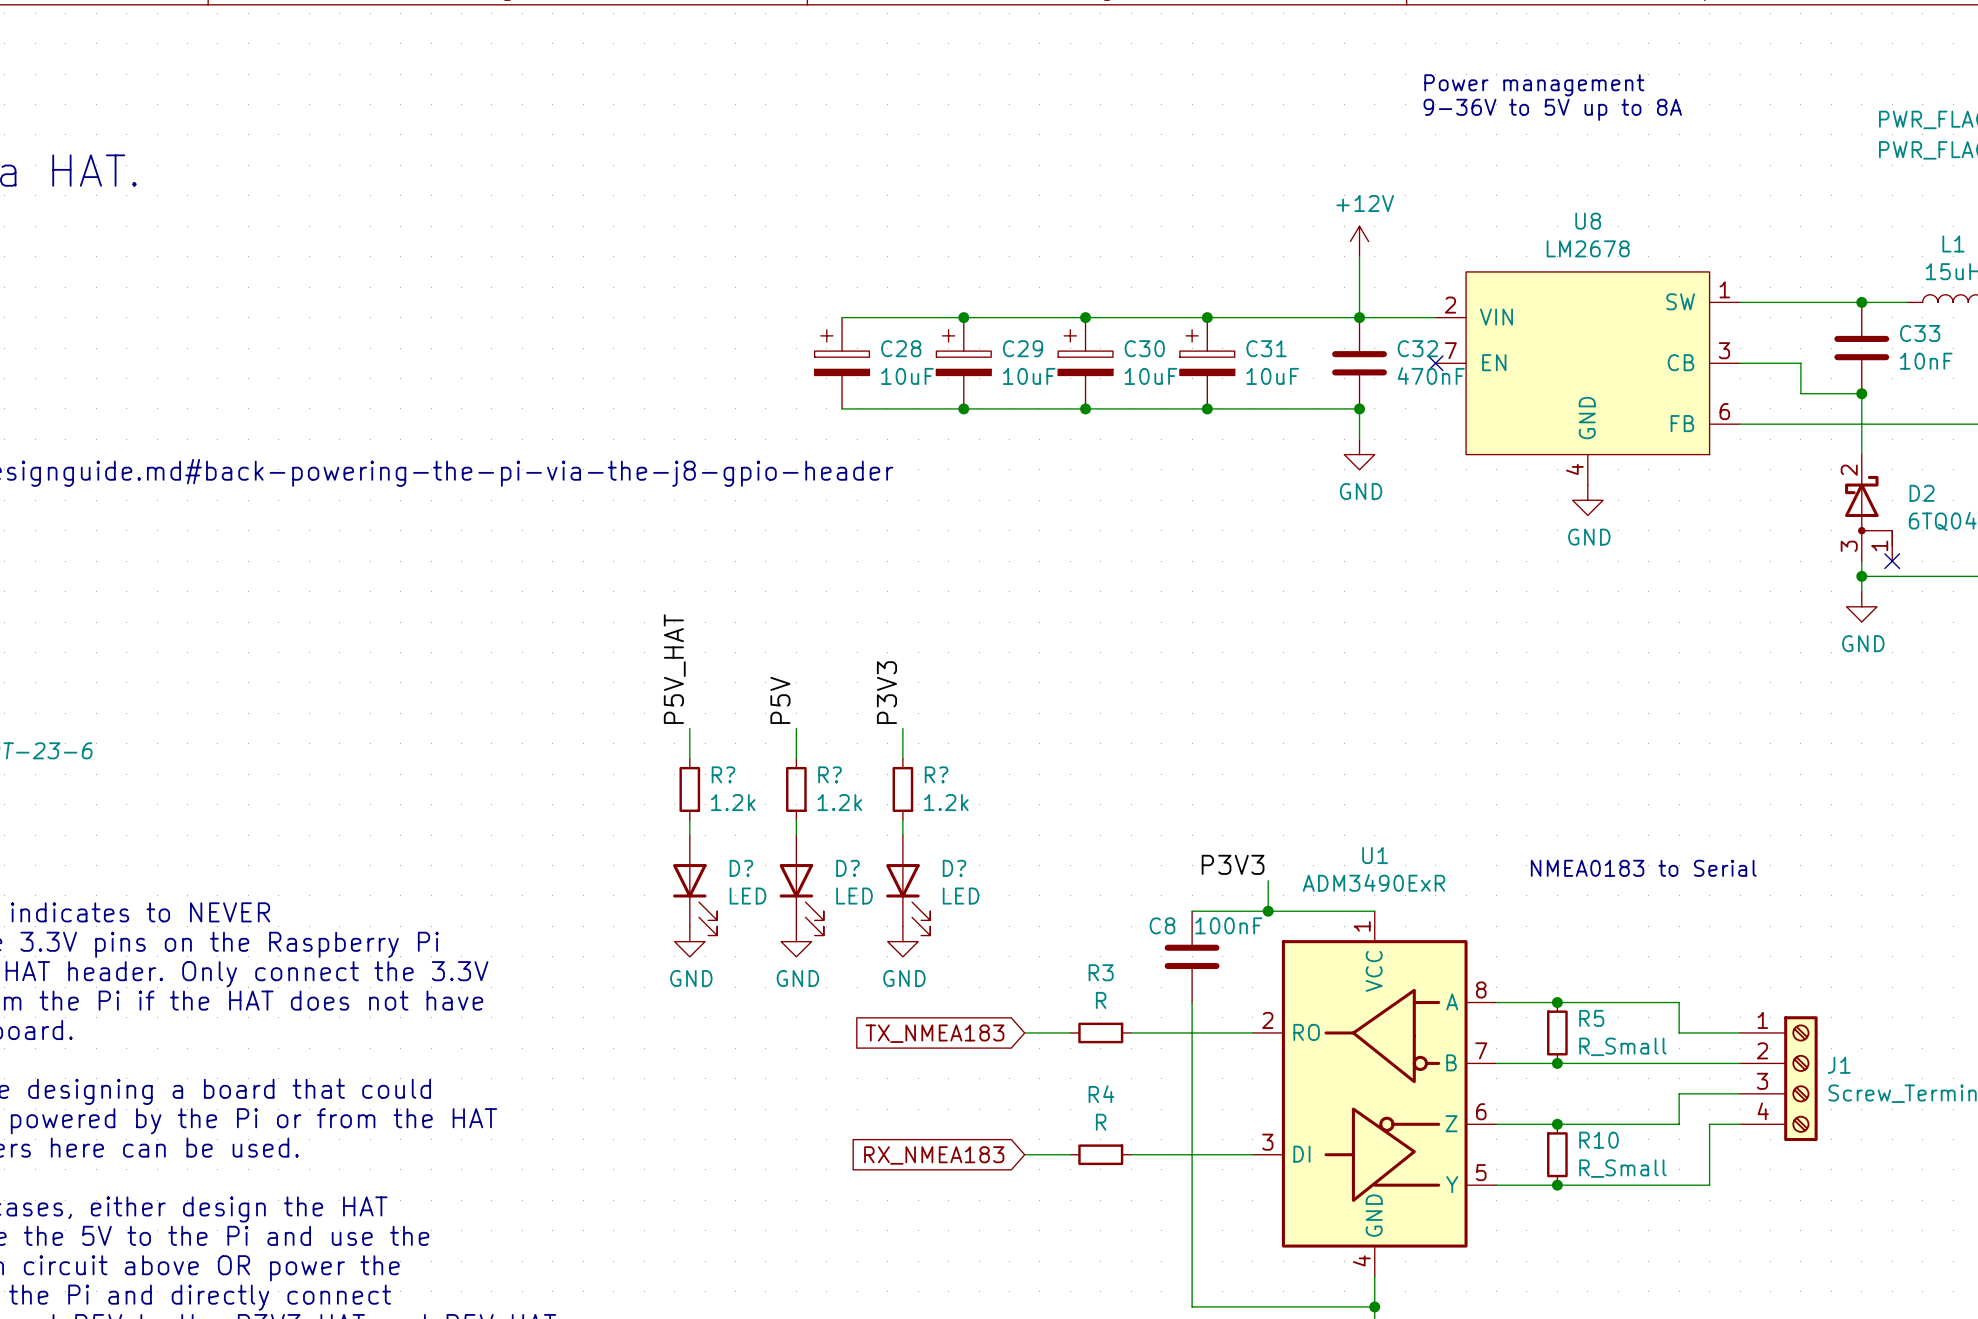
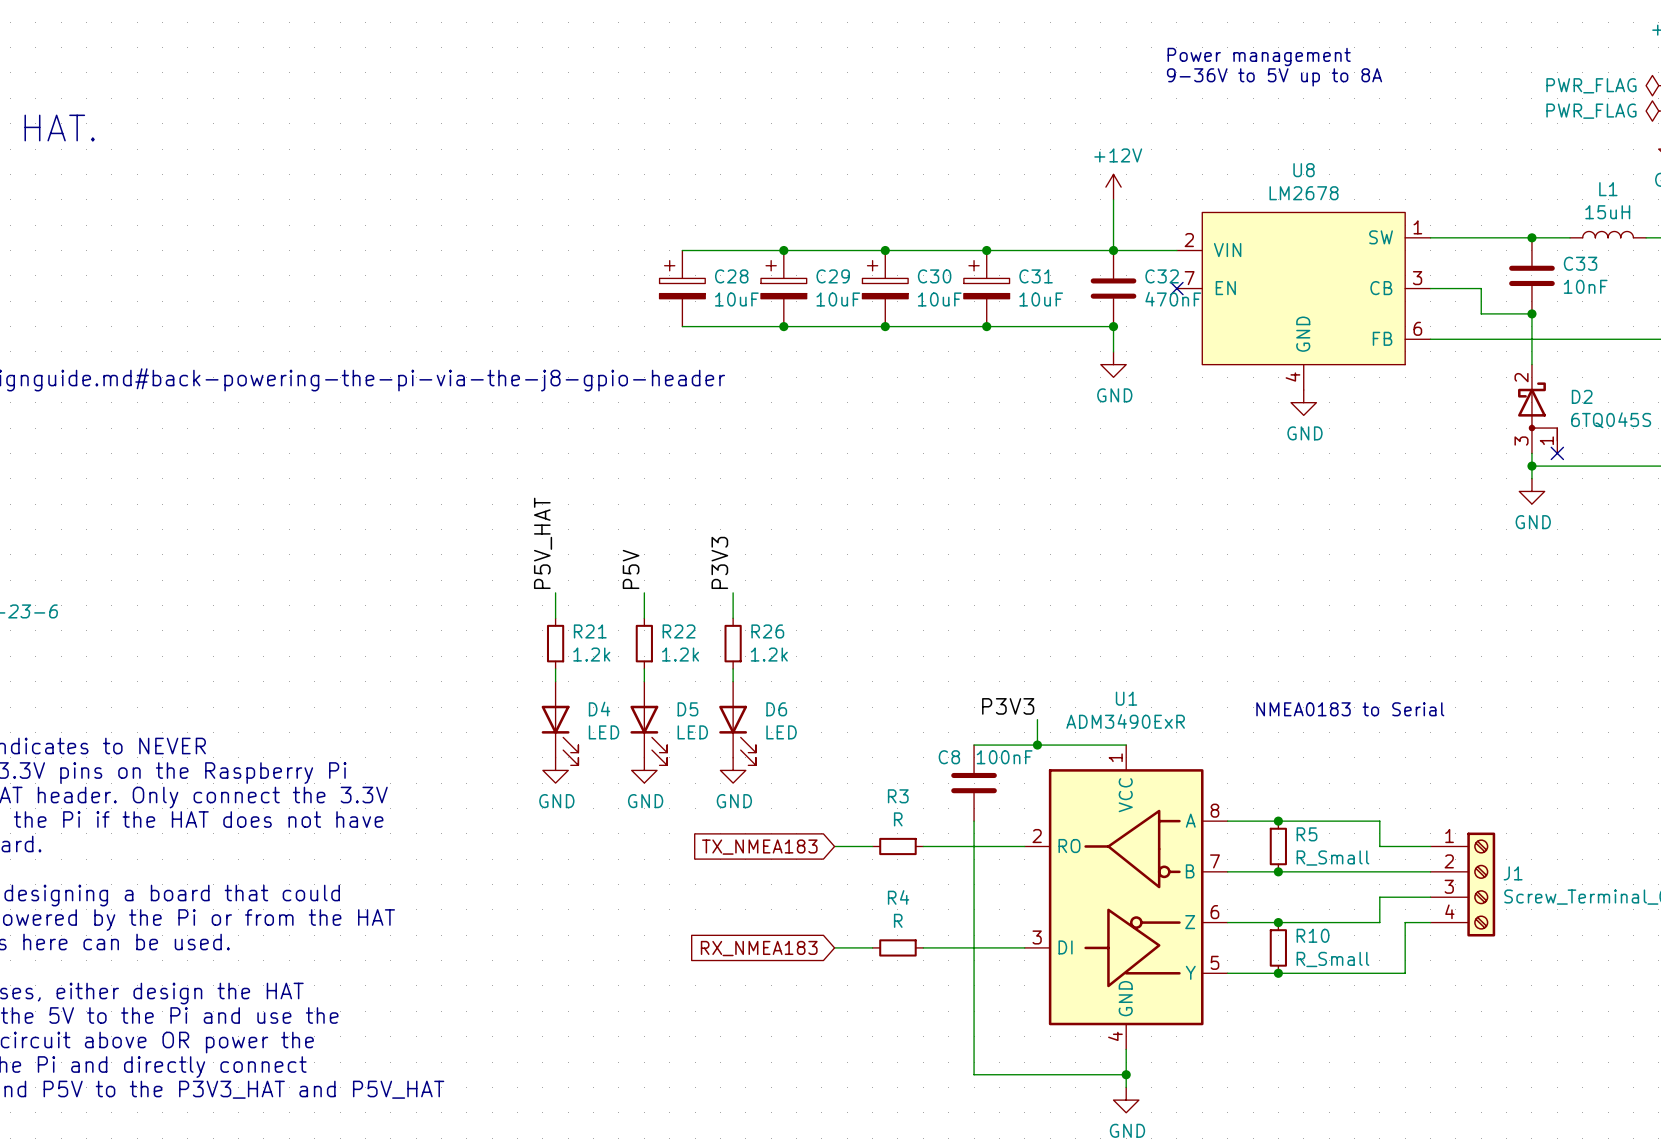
R? name: R? (723, 774) -> R21 (590, 631)
R? name: R? (830, 774) -> R22 (679, 631)
R? name: R? (936, 774) -> R26 (767, 631)
D? name: D? (741, 868) -> D4 (599, 709)
D? name: D? (847, 868) -> D5 (687, 709)
D? name: D? (954, 868) -> D6 (776, 709)

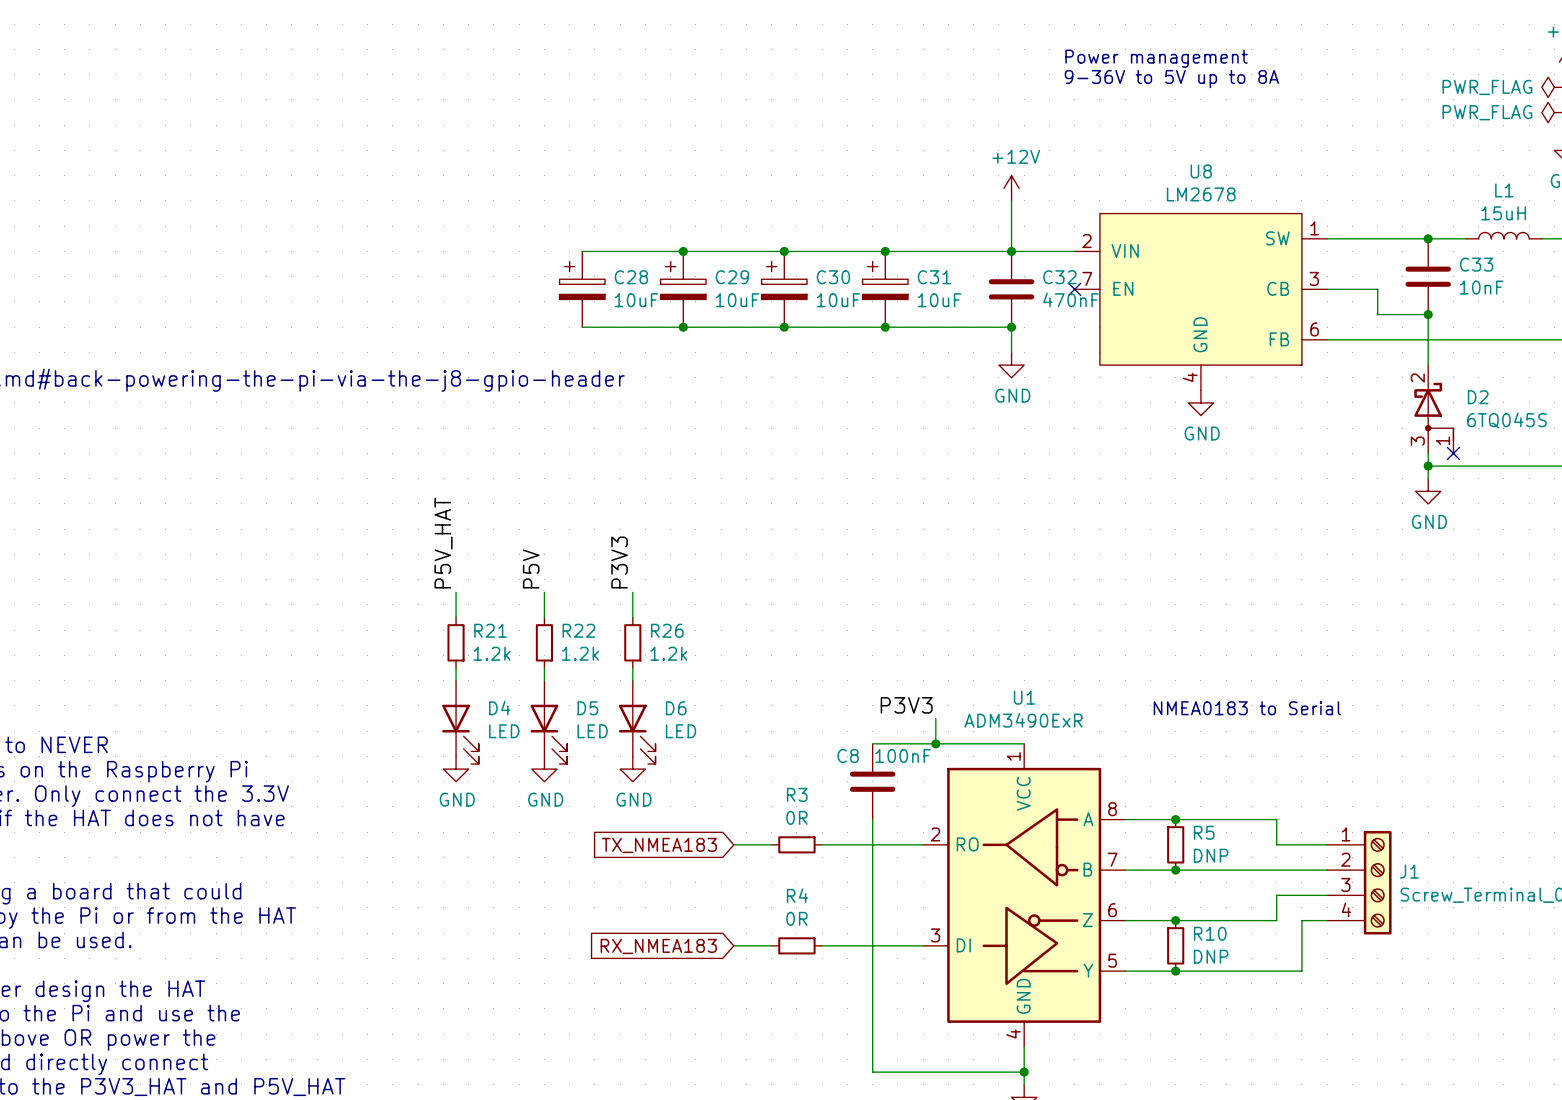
R3 value: R (898, 819) -> 0R (796, 817)
R5 value: R_Small (1332, 858) -> DNP (1211, 855)
R4 value: R (898, 920) -> 0R (796, 918)
R10 value: R_Small (1332, 959) -> DNP (1211, 956)

